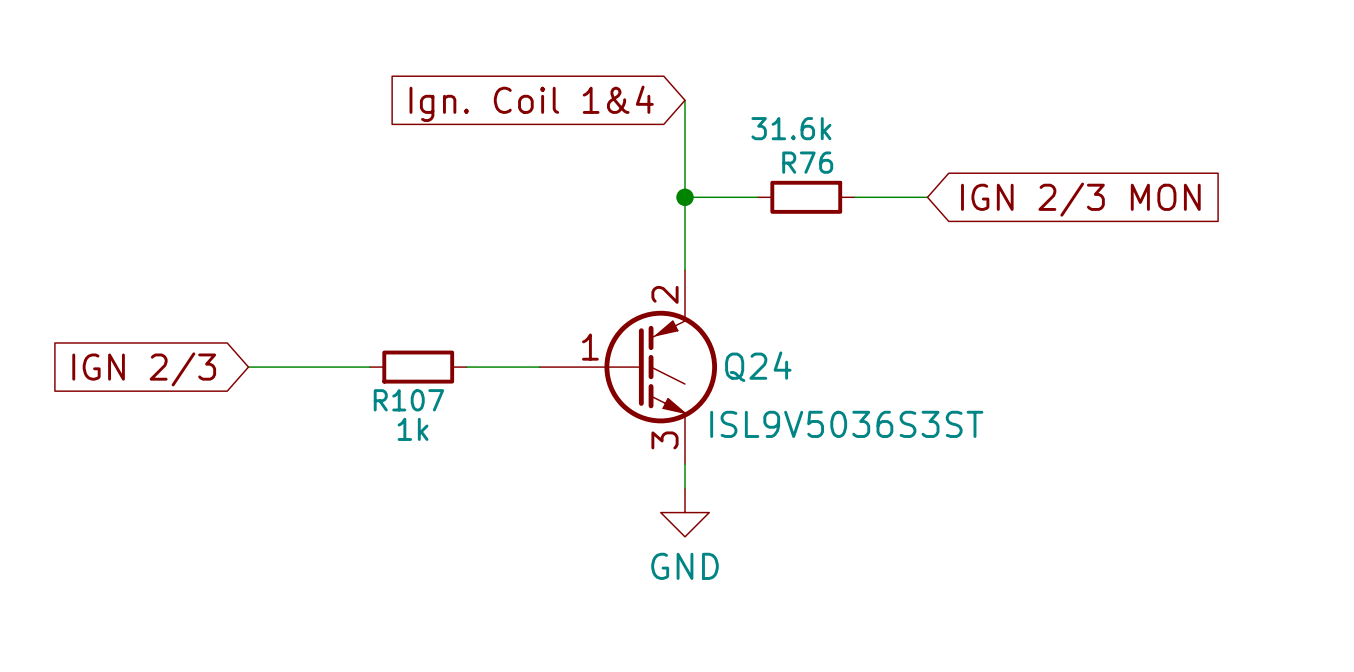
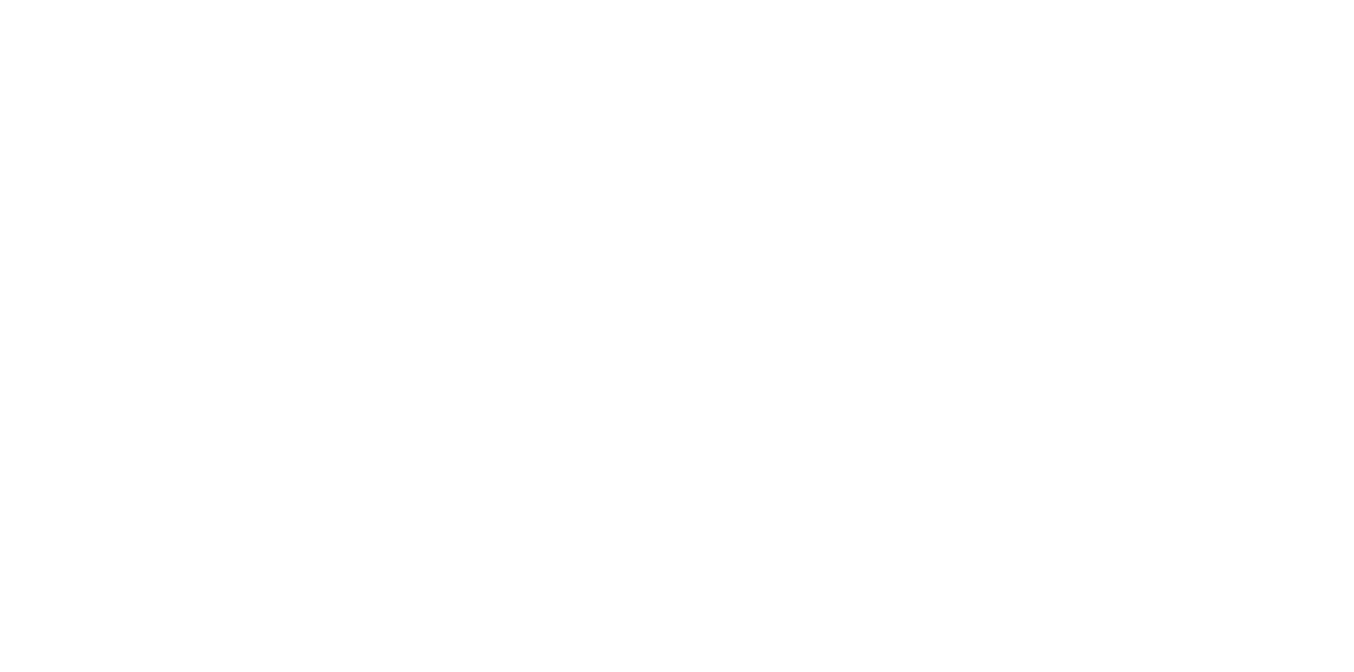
wire: (685, 100) (685, 270) -> none
global label: Ign. Coil 1&4 (531, 103) -> none
wire: (685, 197) (757, 197) -> none
junction: (685, 197) -> none
R76: 31.6k (806, 197) -> none
wire: (854, 197) (927, 197) -> none
global label: IGN 2/3 MON (1080, 199) -> none
wire: (248, 367) (369, 367) -> none
R107: 1k (418, 367) -> none
wire: (466, 367) (539, 367) -> none
Q24: ISL9V5036S3ST (628, 367) -> none
global label: IGN 2/3 (144, 369) -> none
wire: (685, 464) (685, 488) -> none
power symbol: GND (685, 512) -> none

